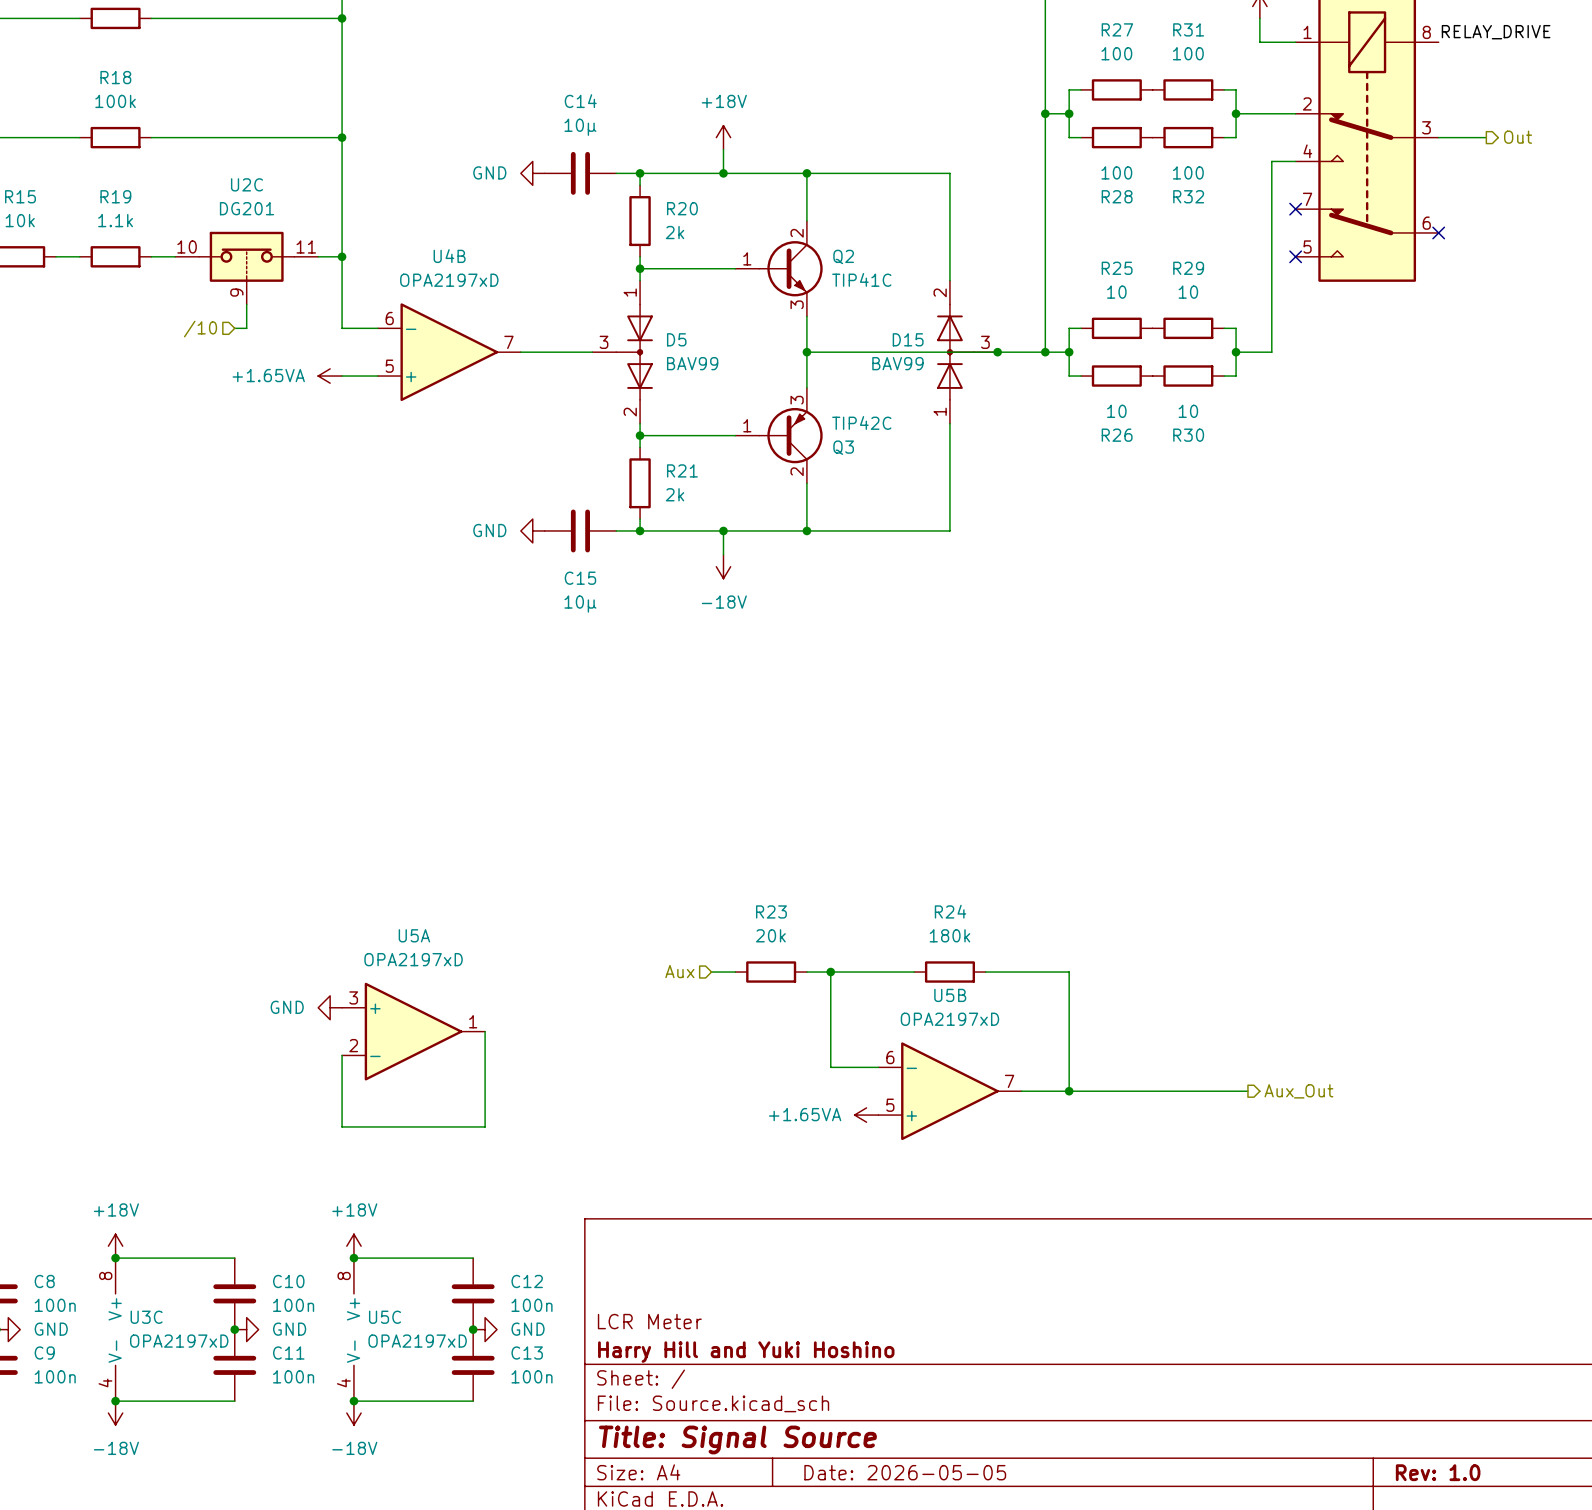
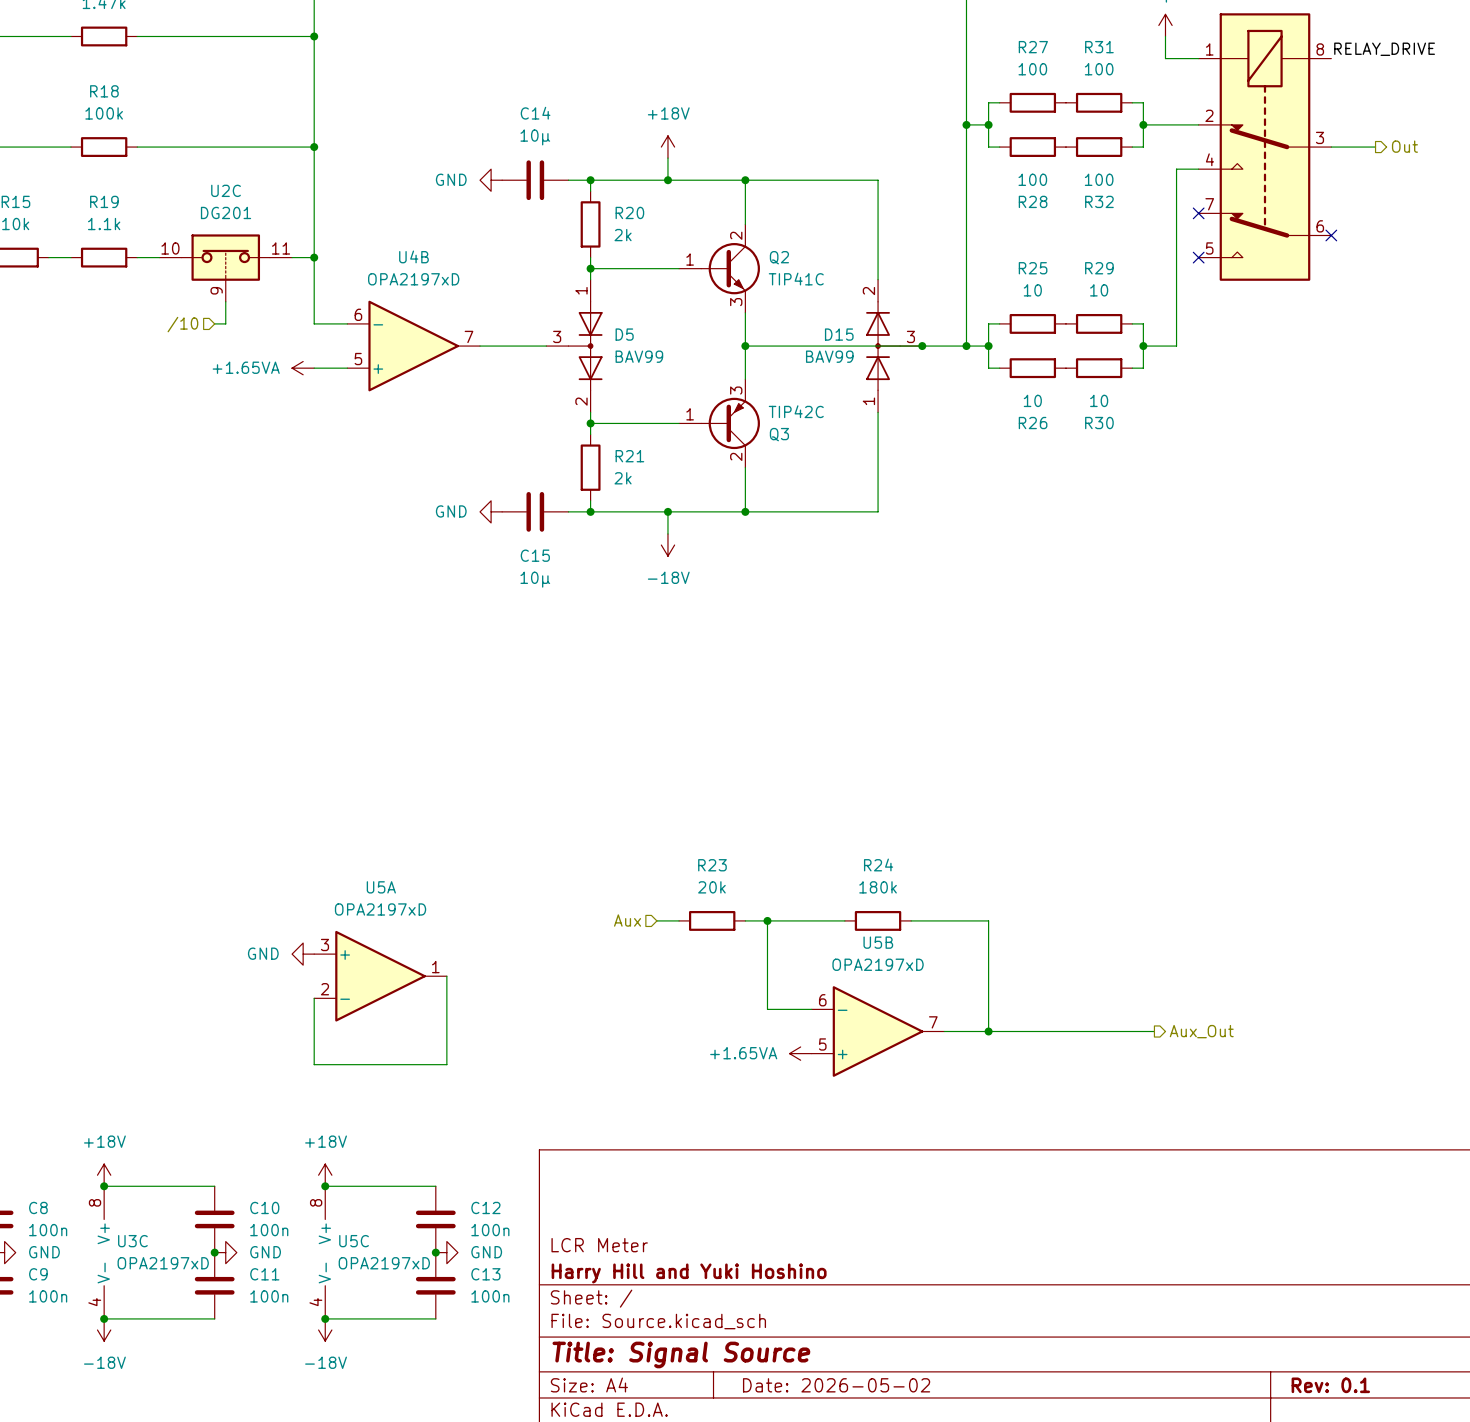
title block: Date: 2026-05-05 (905, 1472) -> Date: 2026-05-02 (836, 1385)
title block: Rev: 1.0 (1438, 1472) -> Rev: 0.1 (1330, 1385)

